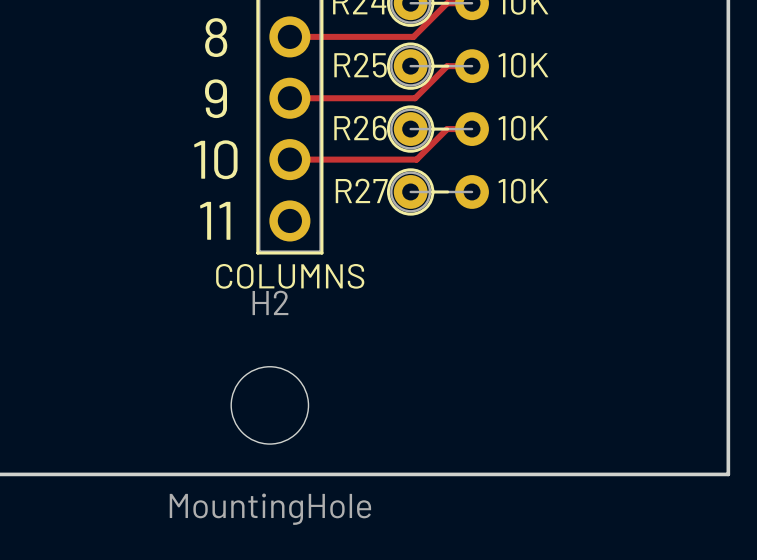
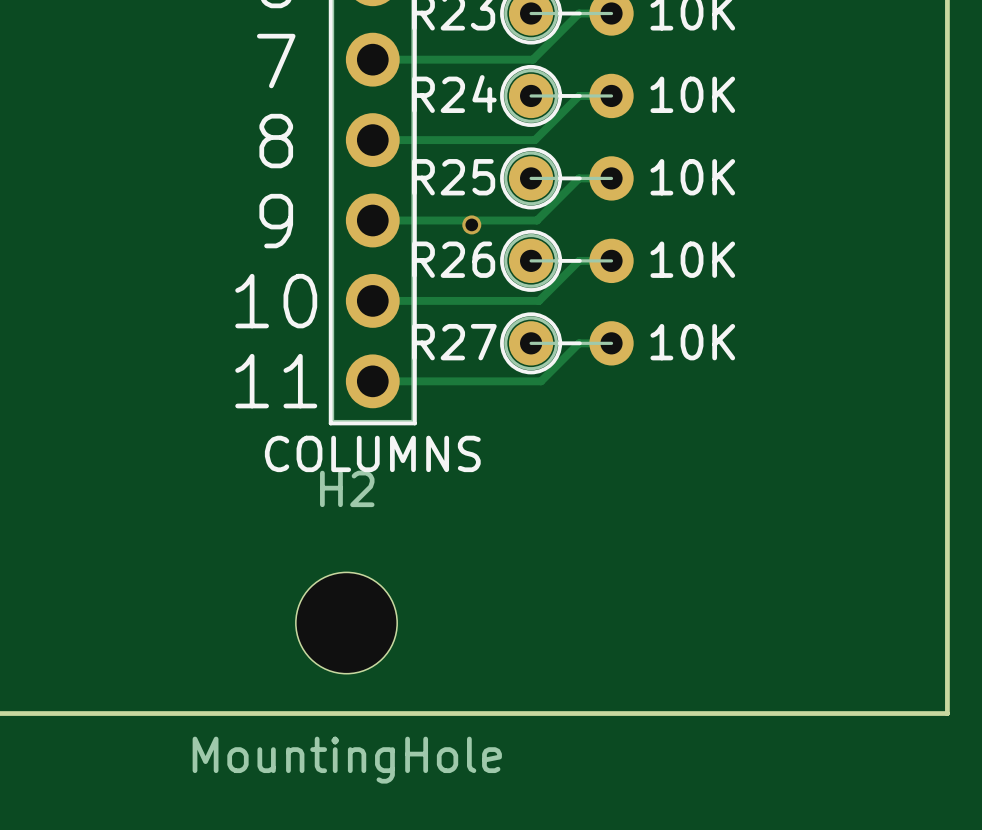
via: none -> (471, 224)
track: none -> (611, 343) (579, 343) (541, 381) (372, 381)

